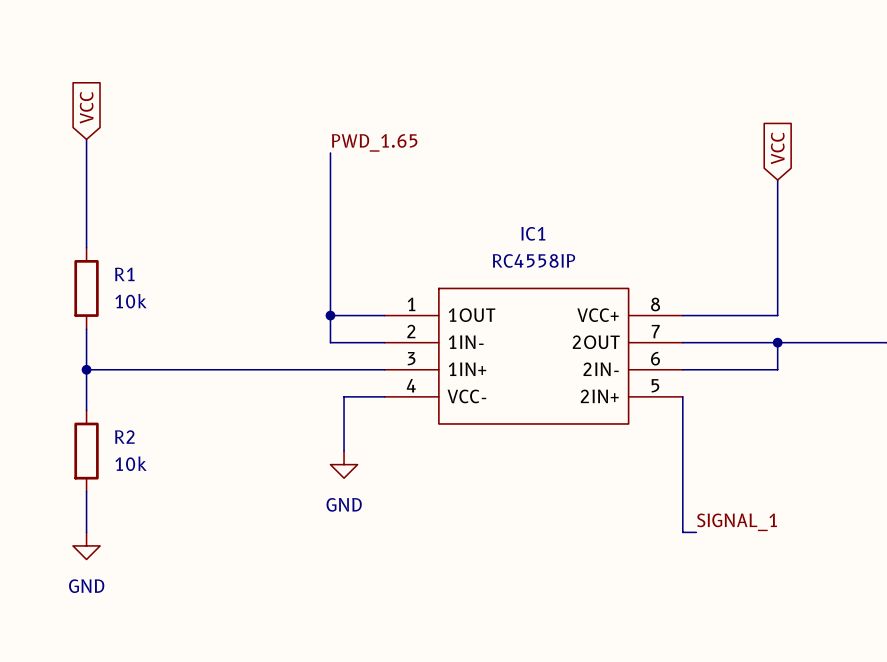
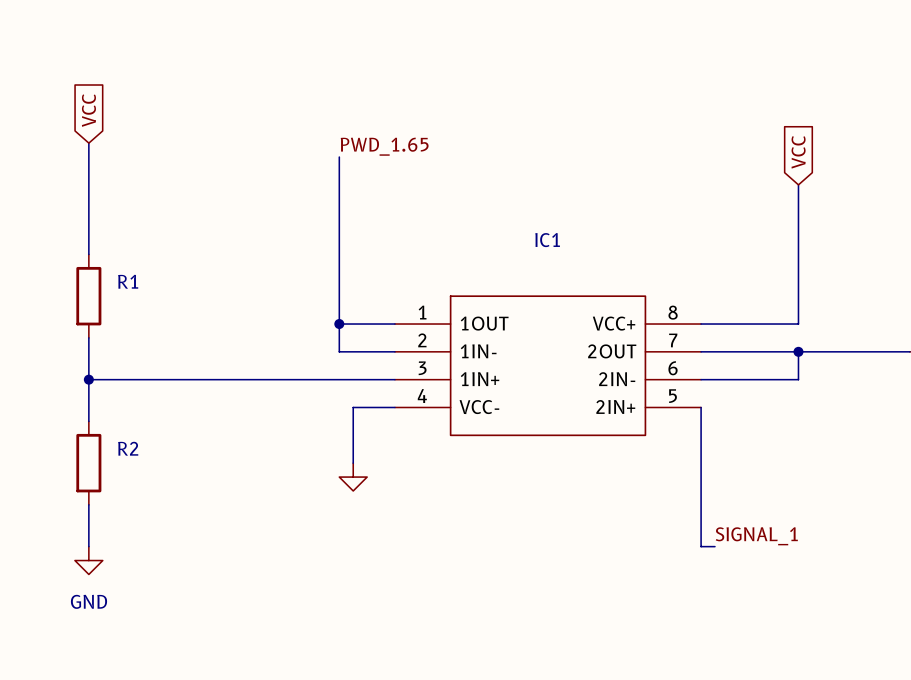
IC1 value: RC4558IP (533, 260) -> none
R1 value: 10k (131, 301) -> none
R2 value: 10k (131, 463) -> none
power symbol text: GND (344, 504) -> none

